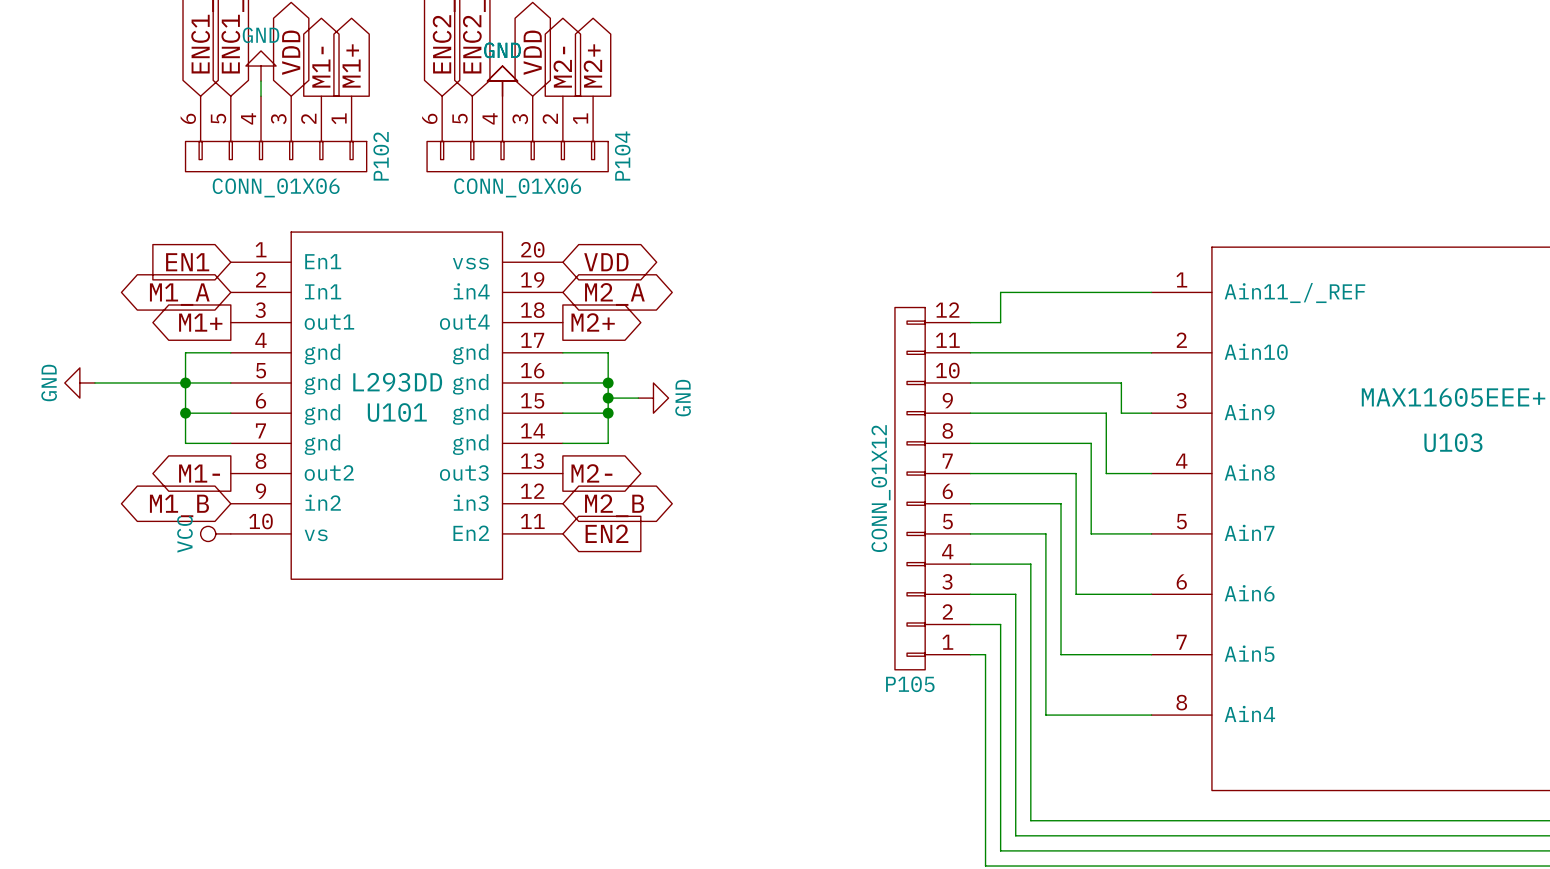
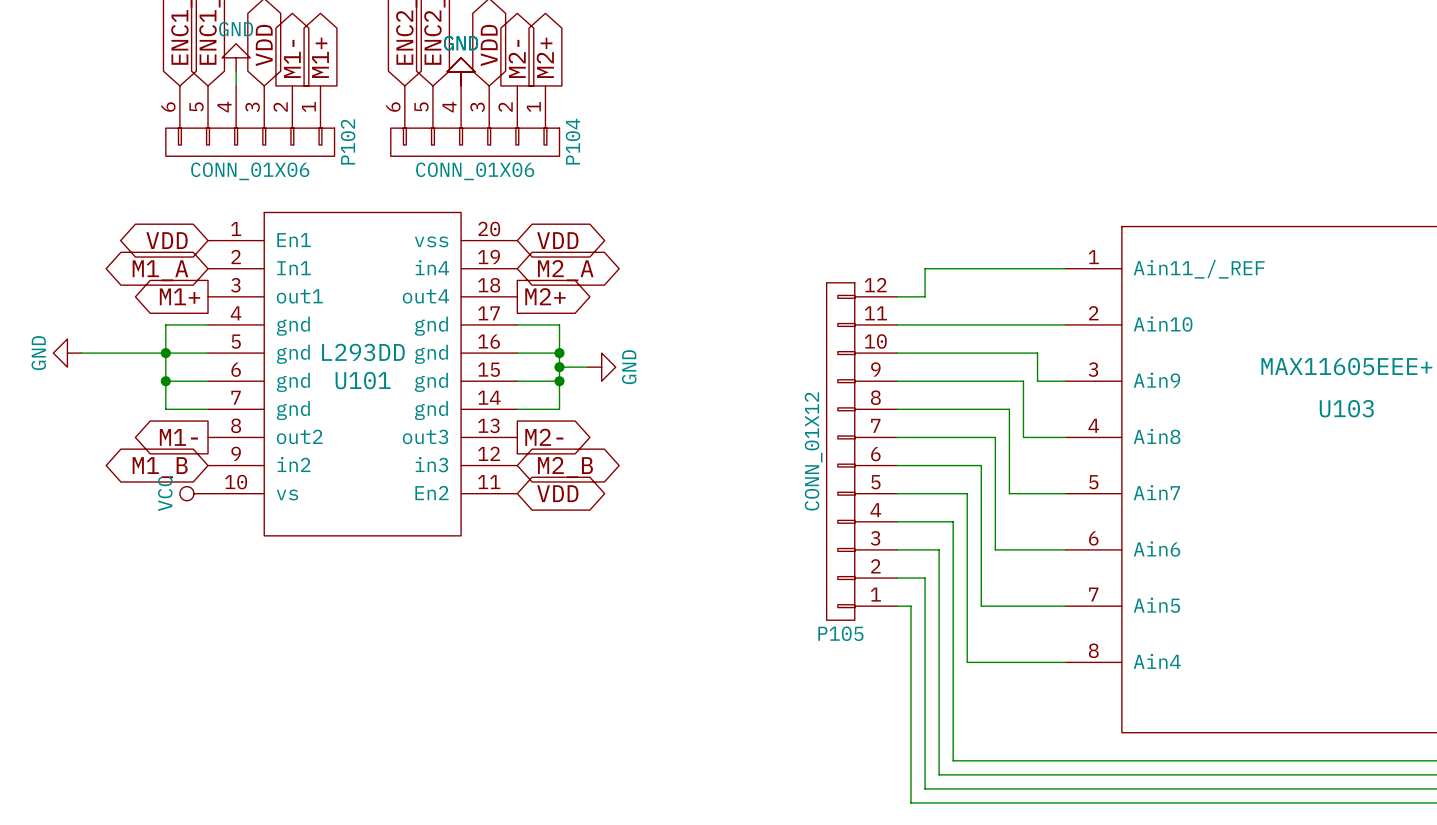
global label shape: input (187, 262) -> bidirectional (167, 240)
global label: EN1 (187, 262) -> VDD (167, 240)
global label shape: input (606, 533) -> bidirectional (557, 493)
global label: EN2 (606, 533) -> VDD (557, 493)

